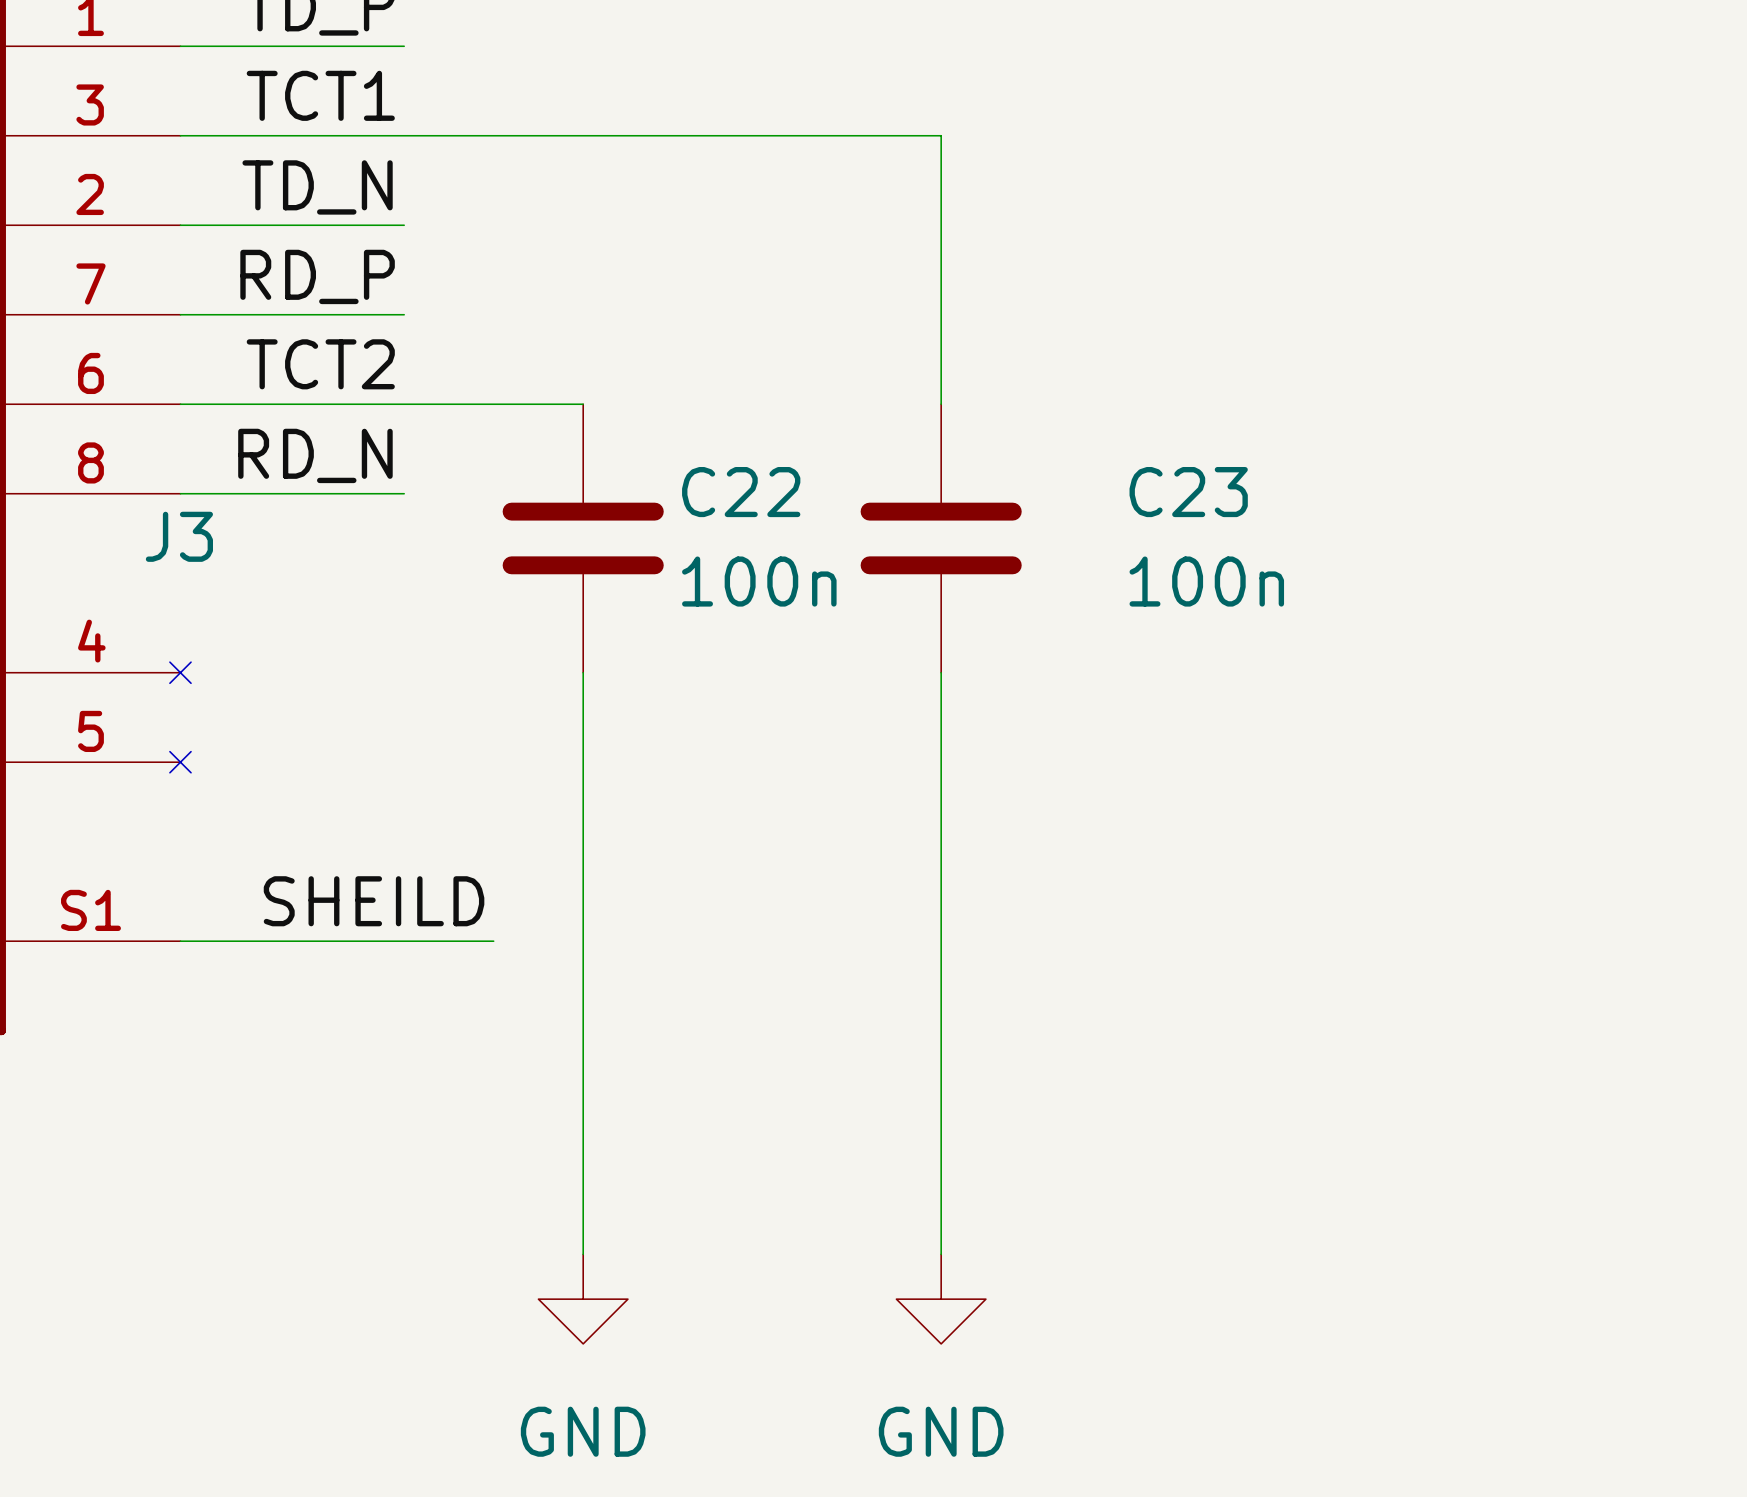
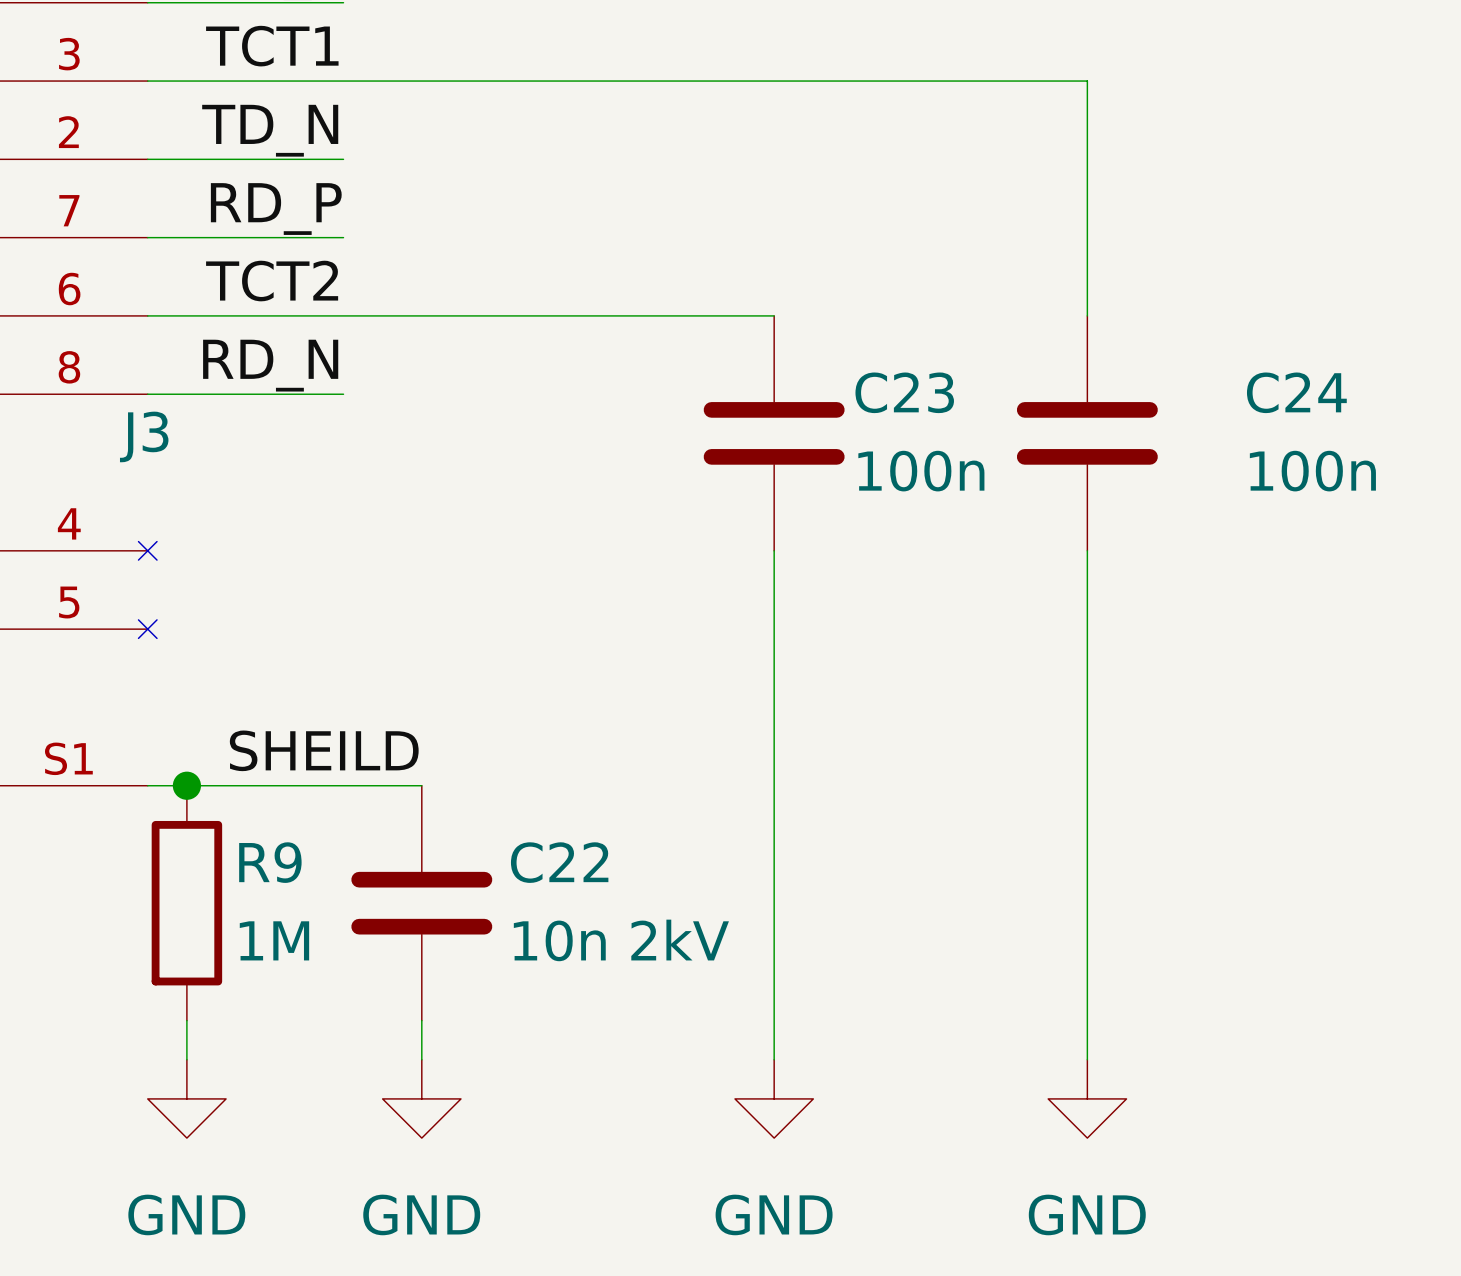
wire: (941, 135) (941, 404) -> (813, 81) (1087, 81) (1087, 315)
wire: none -> (500, 315) (774, 315)
C22 name position: C22 (741, 492) -> C22 (559, 862)
C23 name position: C23 (1188, 492) -> C23 (904, 392)
C22 position: (583, 538) -> (421, 903)
C23 position: (941, 538) -> (774, 433)
C24: none -> 100n (1087, 433)
C22 value: 100n (759, 581) -> 10n 2kV (621, 940)
C23 value position: 100n (1206, 581) -> 100n (921, 471)
wire: (583, 672) (583, 1254) -> (774, 550) (774, 1059)
wire: (941, 672) (941, 1254) -> (1087, 550) (1087, 1059)
junction: none -> (186, 785)
R9: none -> 1M (186, 903)
wire: none -> (186, 1020) (186, 1059)
wire: none -> (421, 1020) (421, 1059)
power symbol: none -> GND (186, 1098)
power symbol position: GND (583, 1299) -> GND (421, 1098)
power symbol position: GND (941, 1299) -> GND (774, 1098)
power symbol: none -> GND (1087, 1098)

